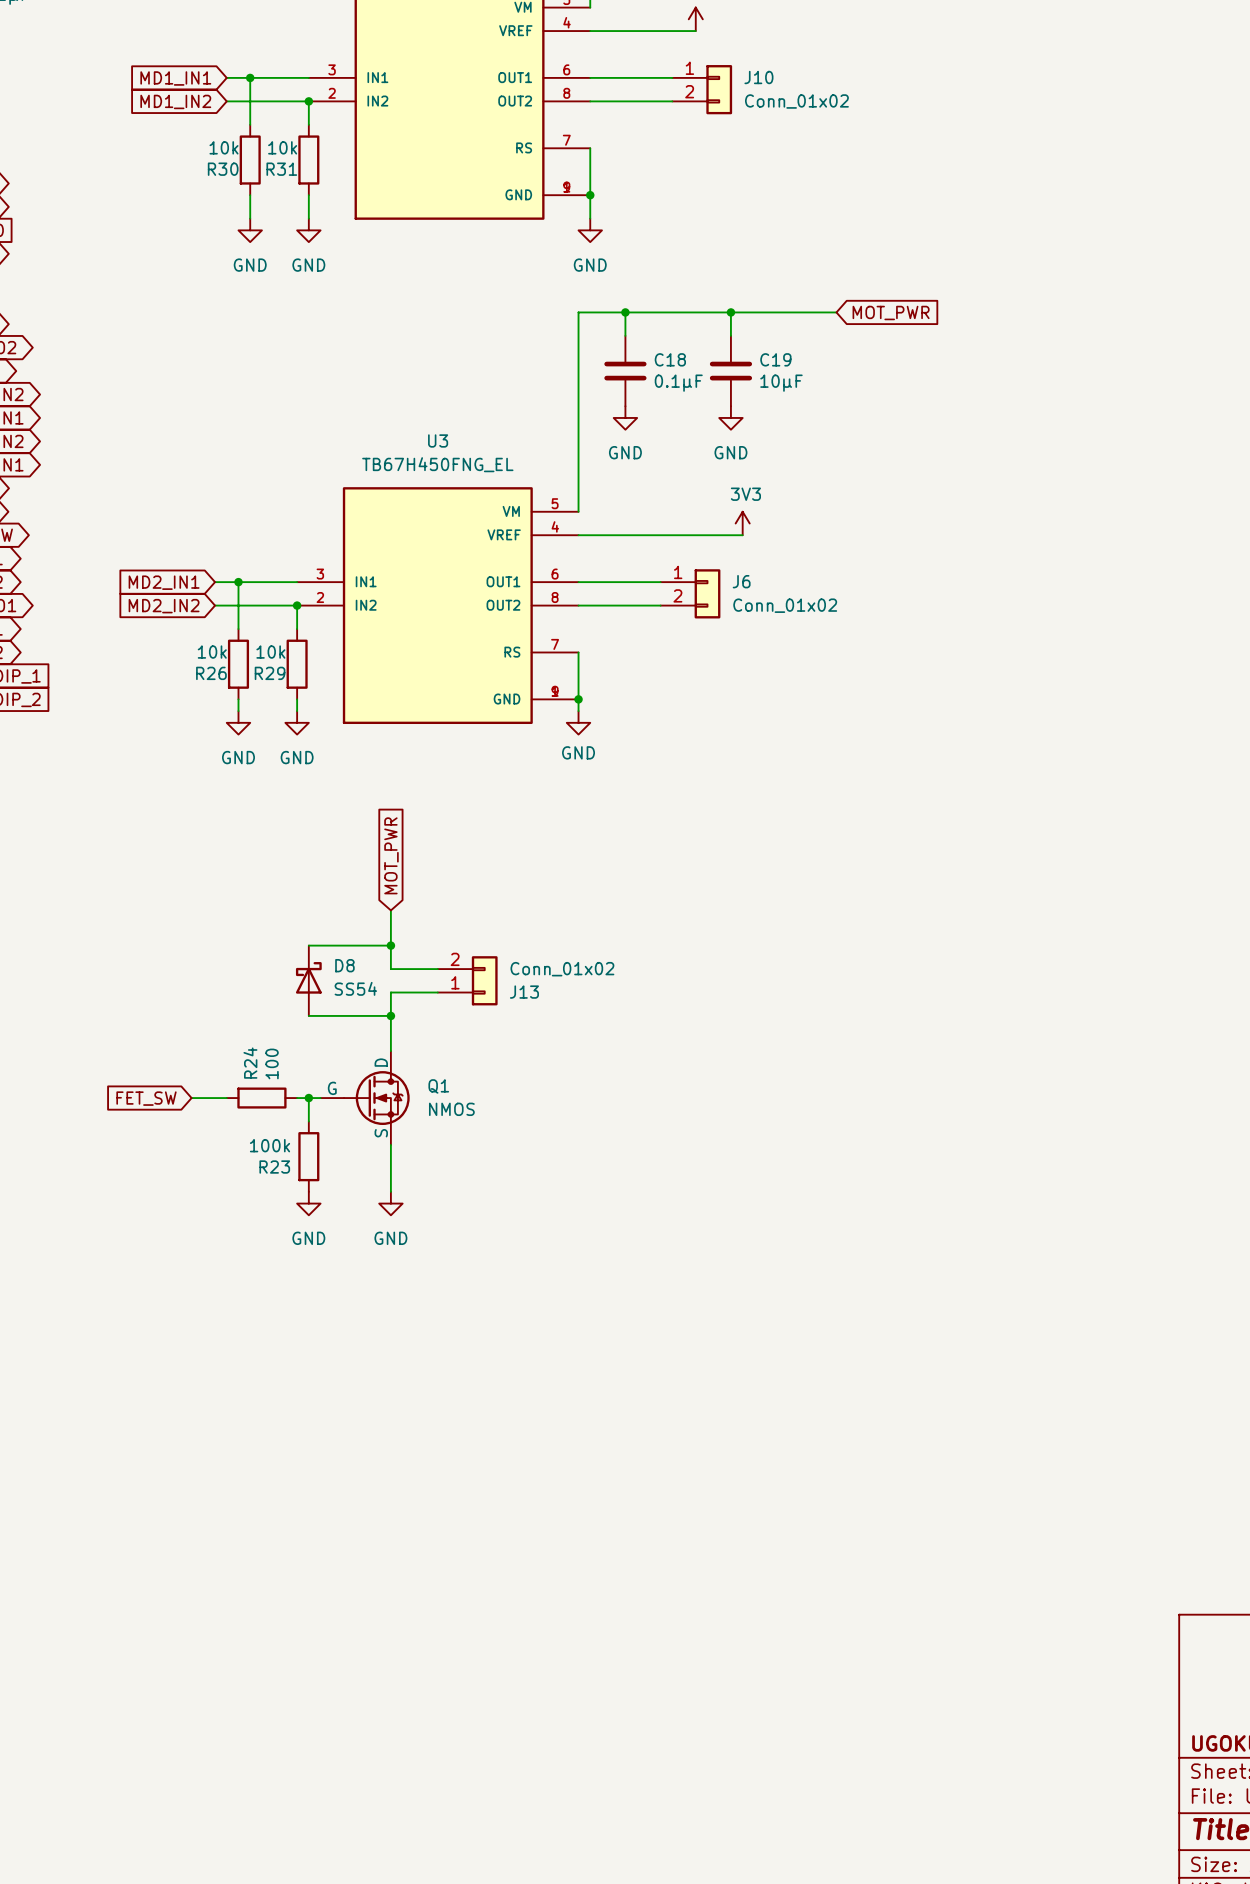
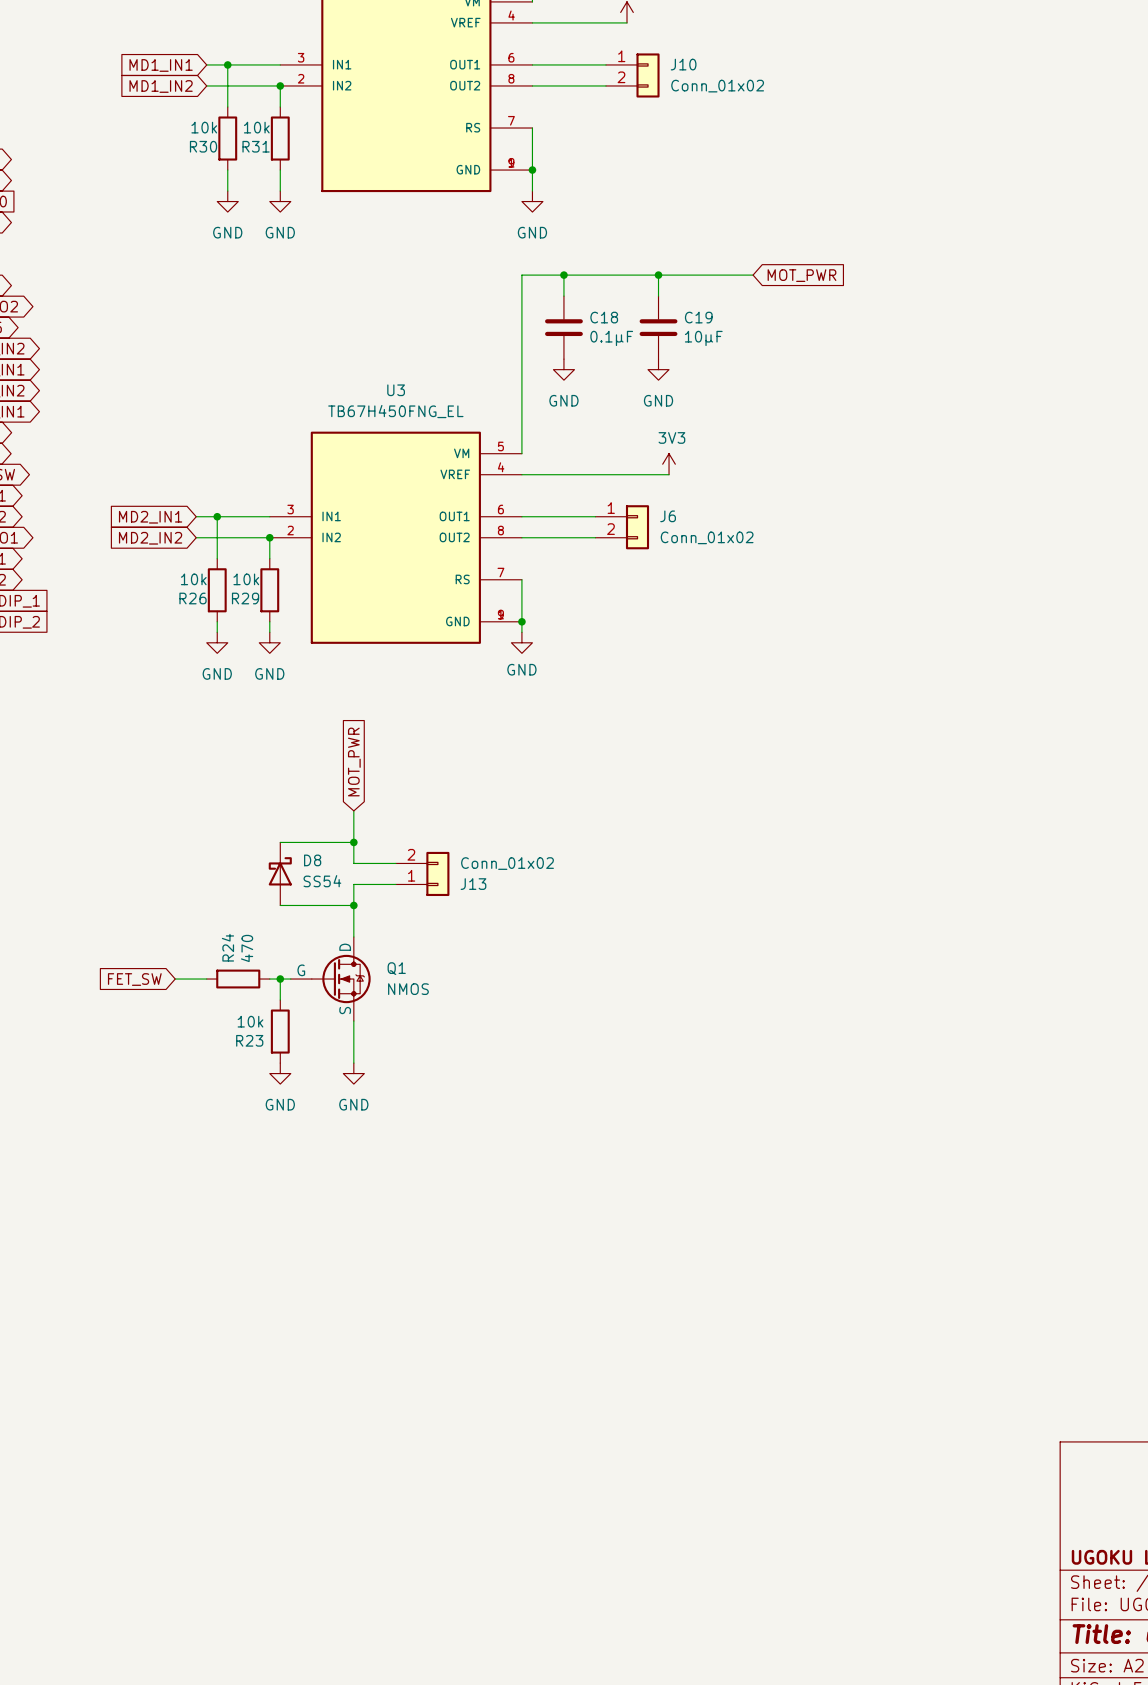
R24 value: 100 (272, 1063) -> 470 (247, 948)
R23 value: 100k (270, 1145) -> 10k (250, 1021)

